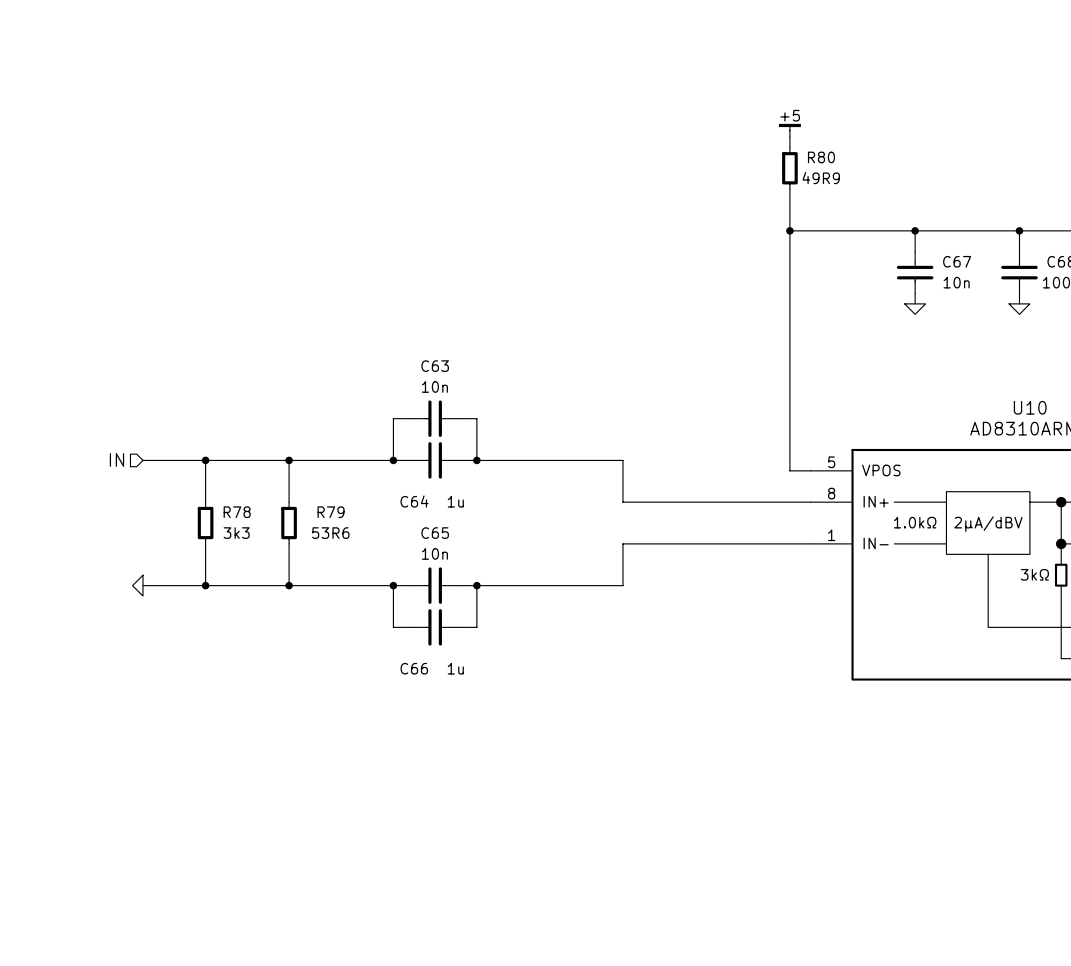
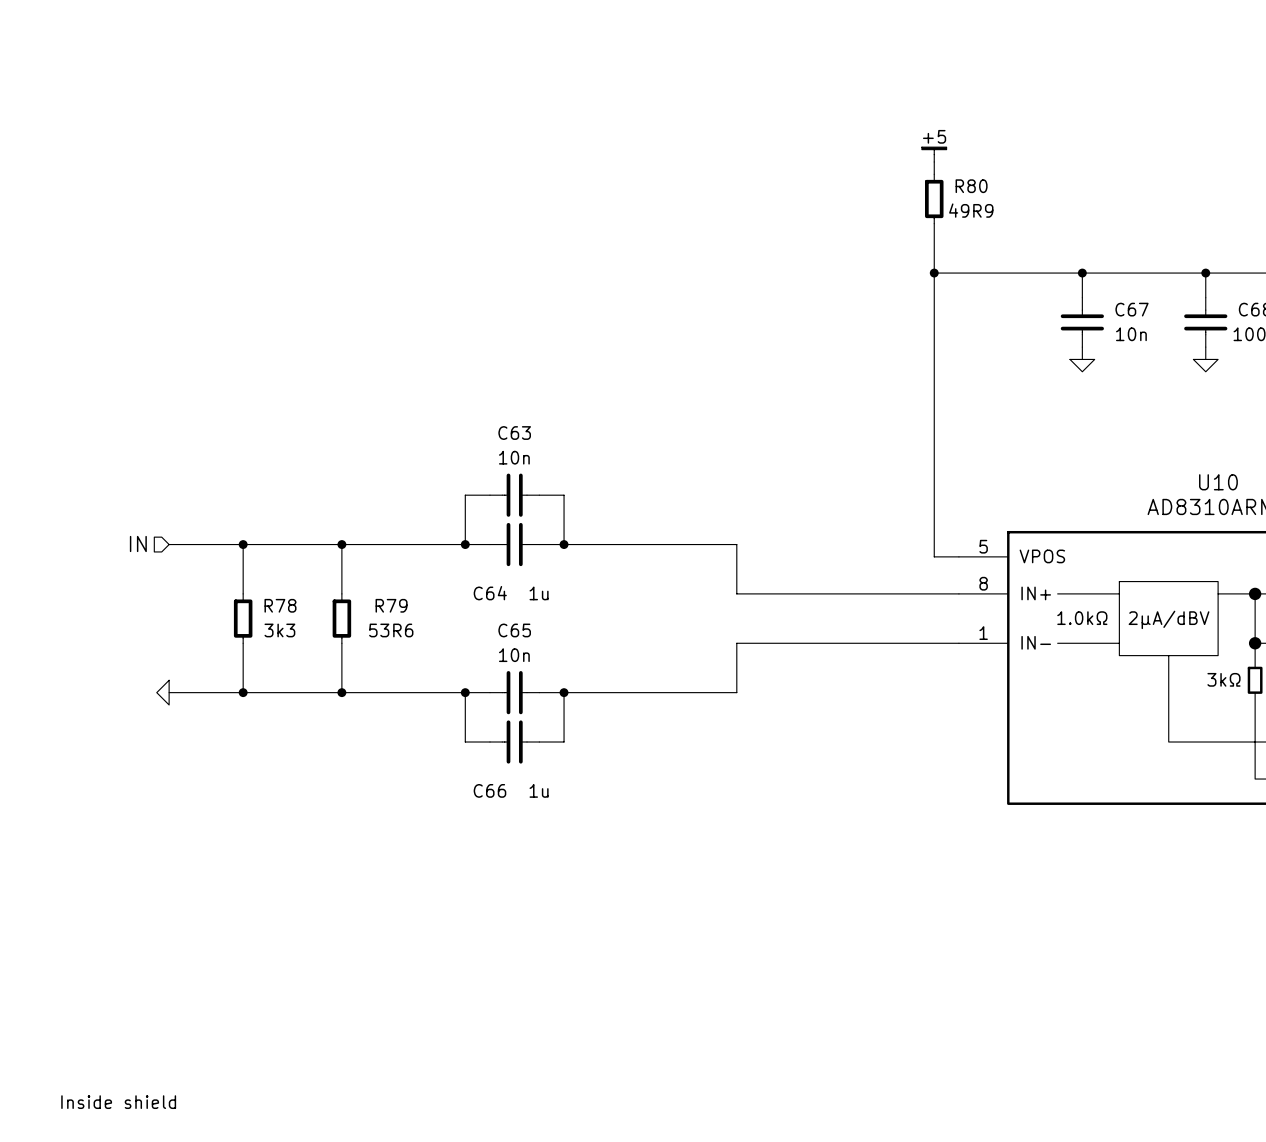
text: none -> Inside shield (118, 1102)

